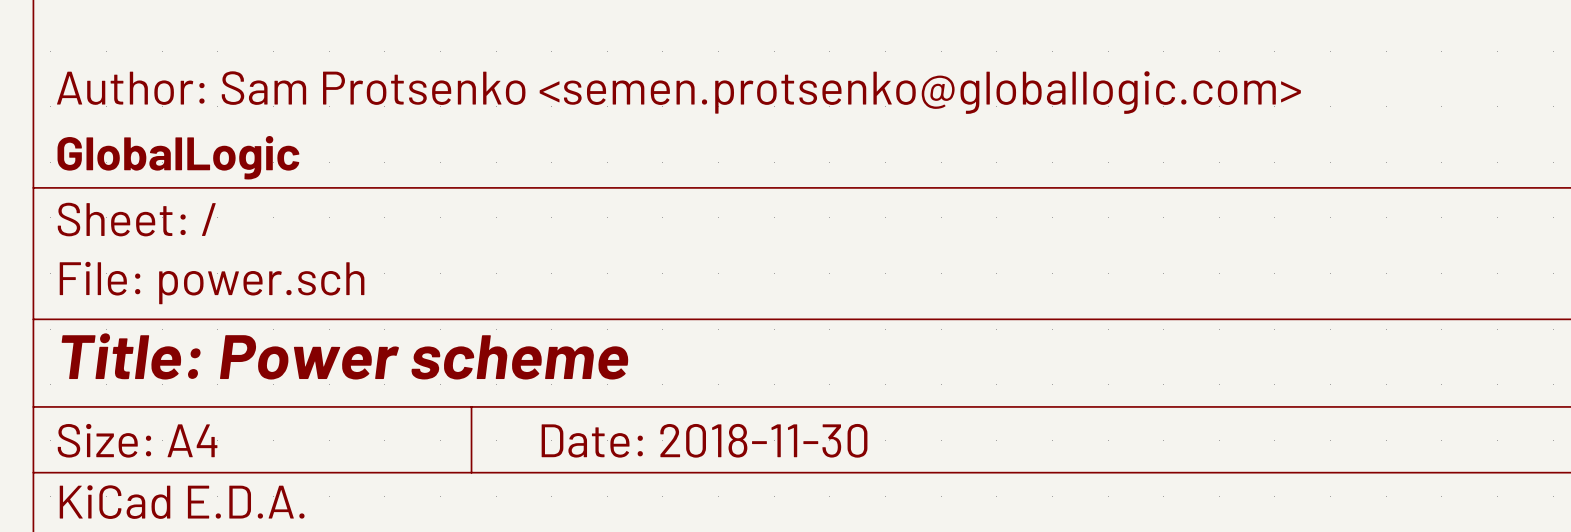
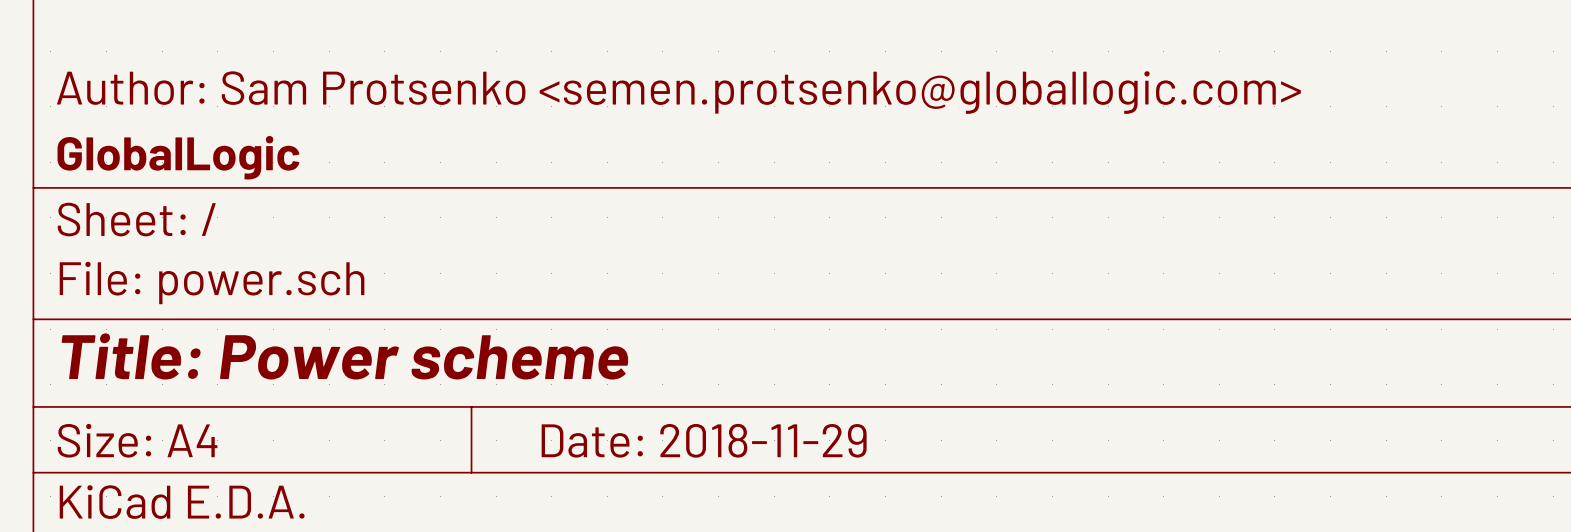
title block: Date: 2018-11-30 (704, 440) -> Date: 2018-11-29 (704, 440)

